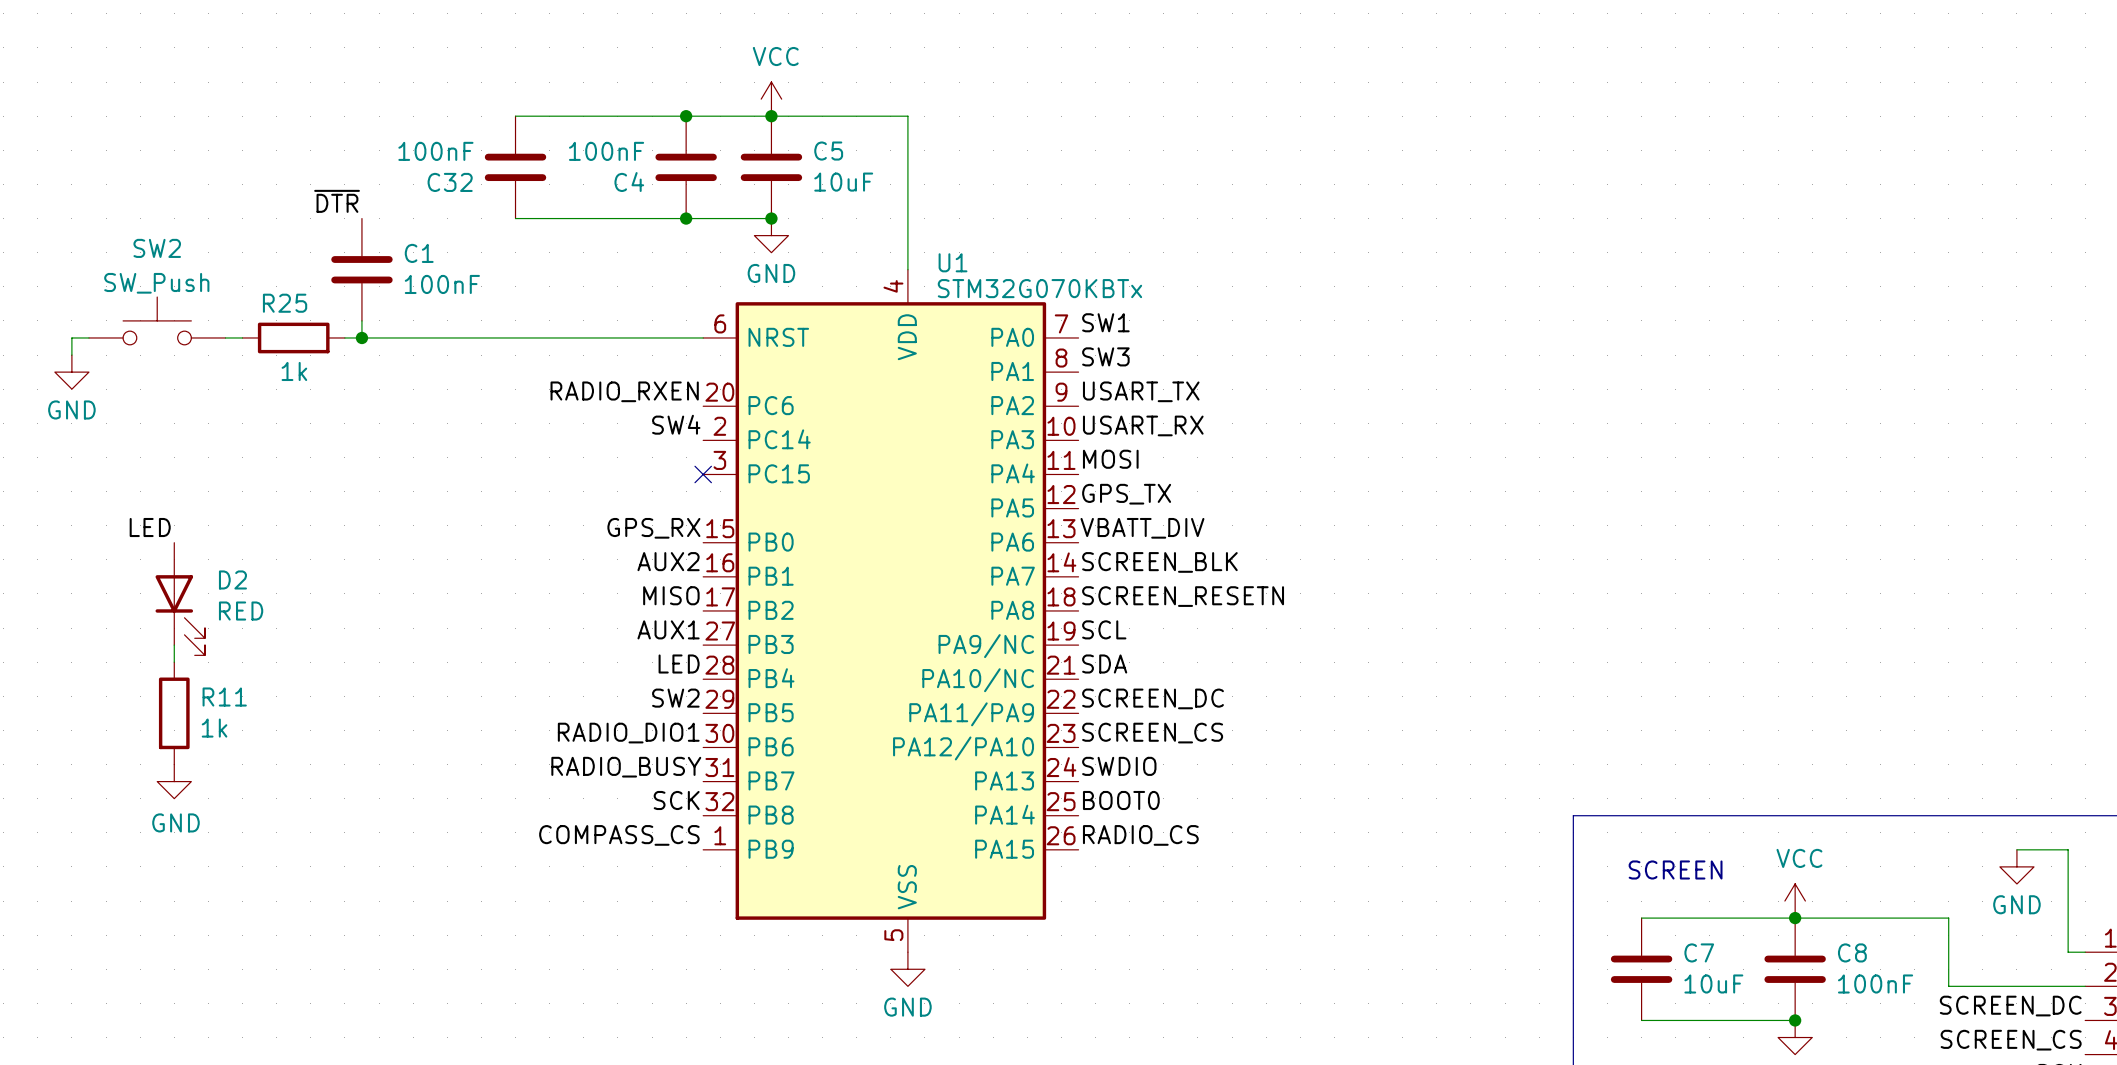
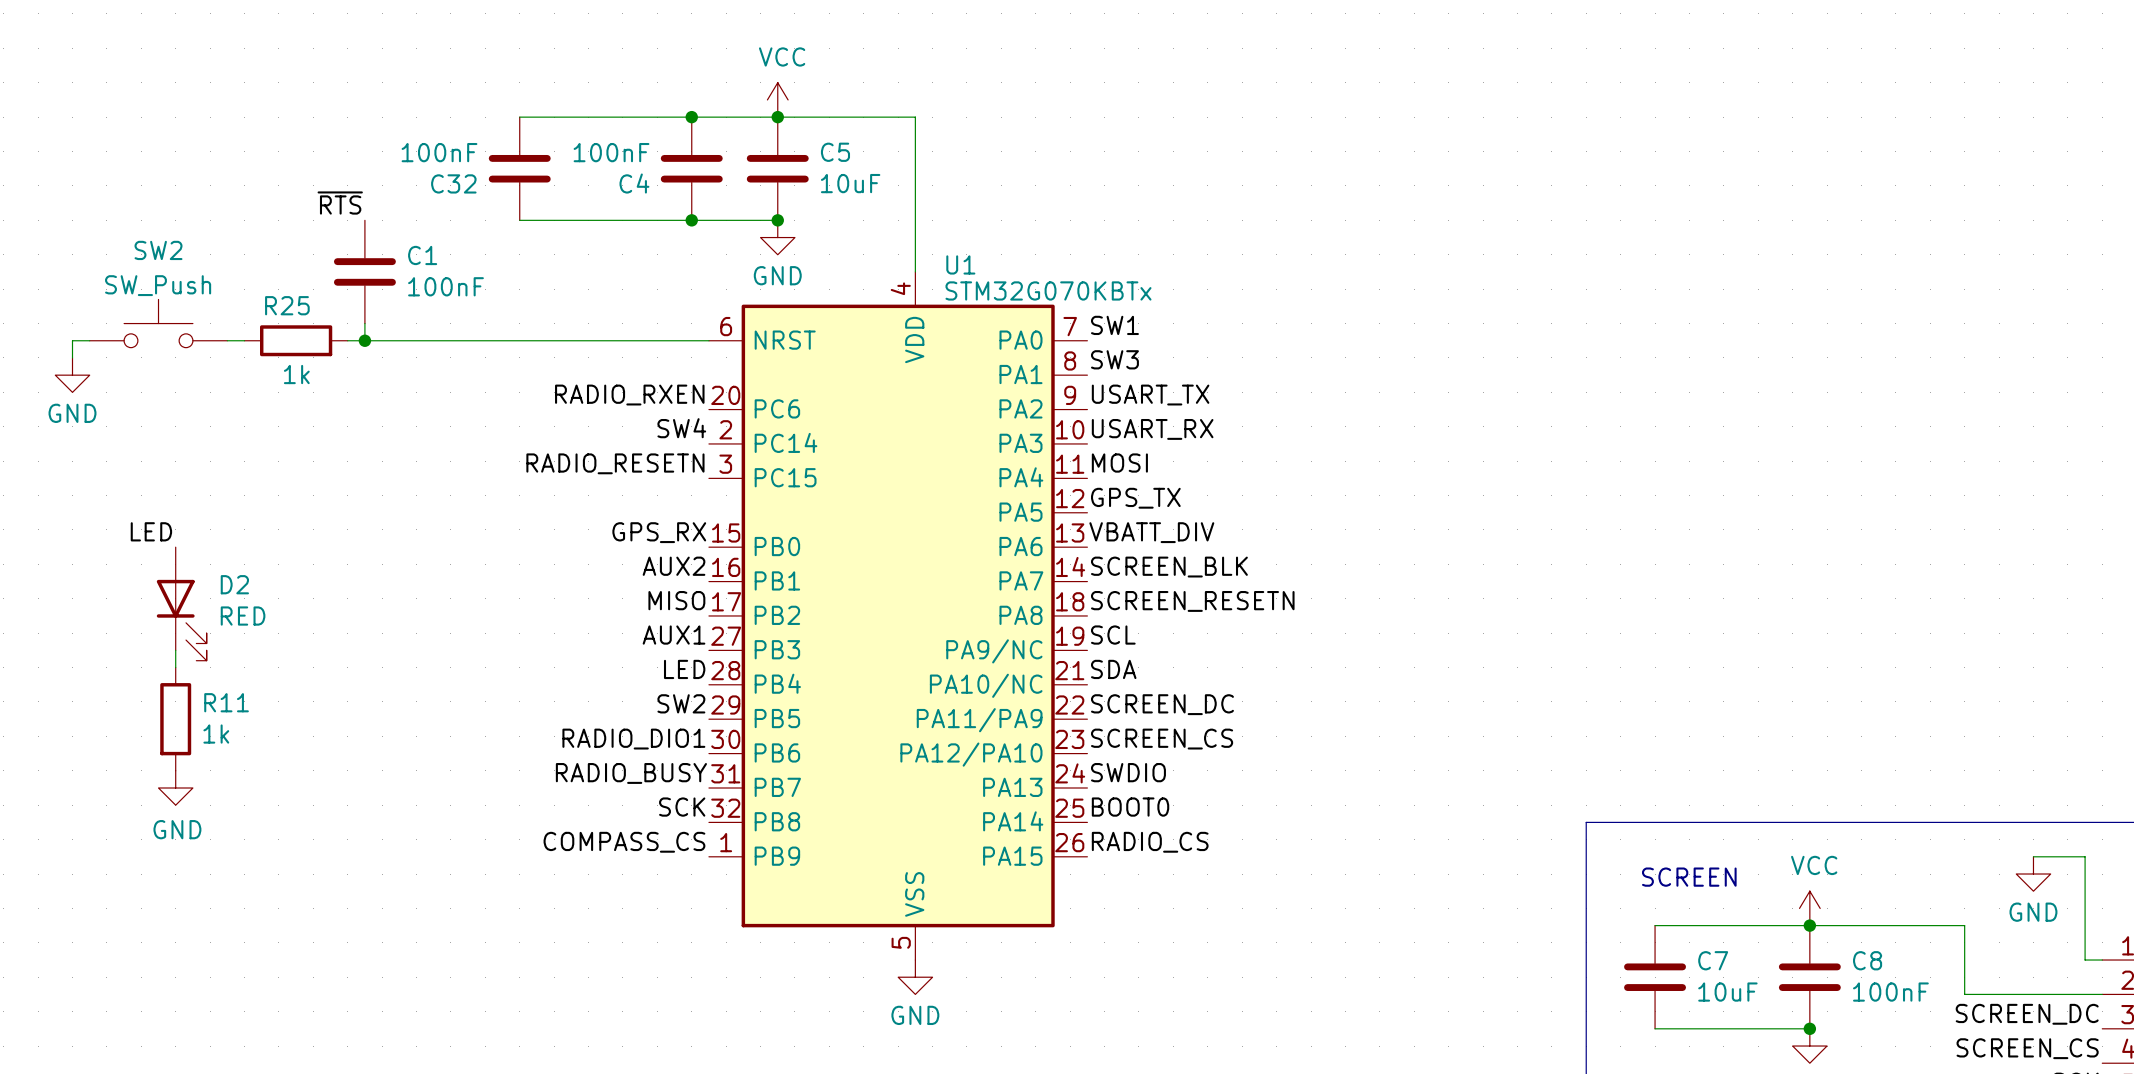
label: ~{DTR} (337, 201) -> ~{RTS} (340, 203)
label: none -> RADIO_RESETN (615, 463)
no-connect mark: (703, 474) -> none

